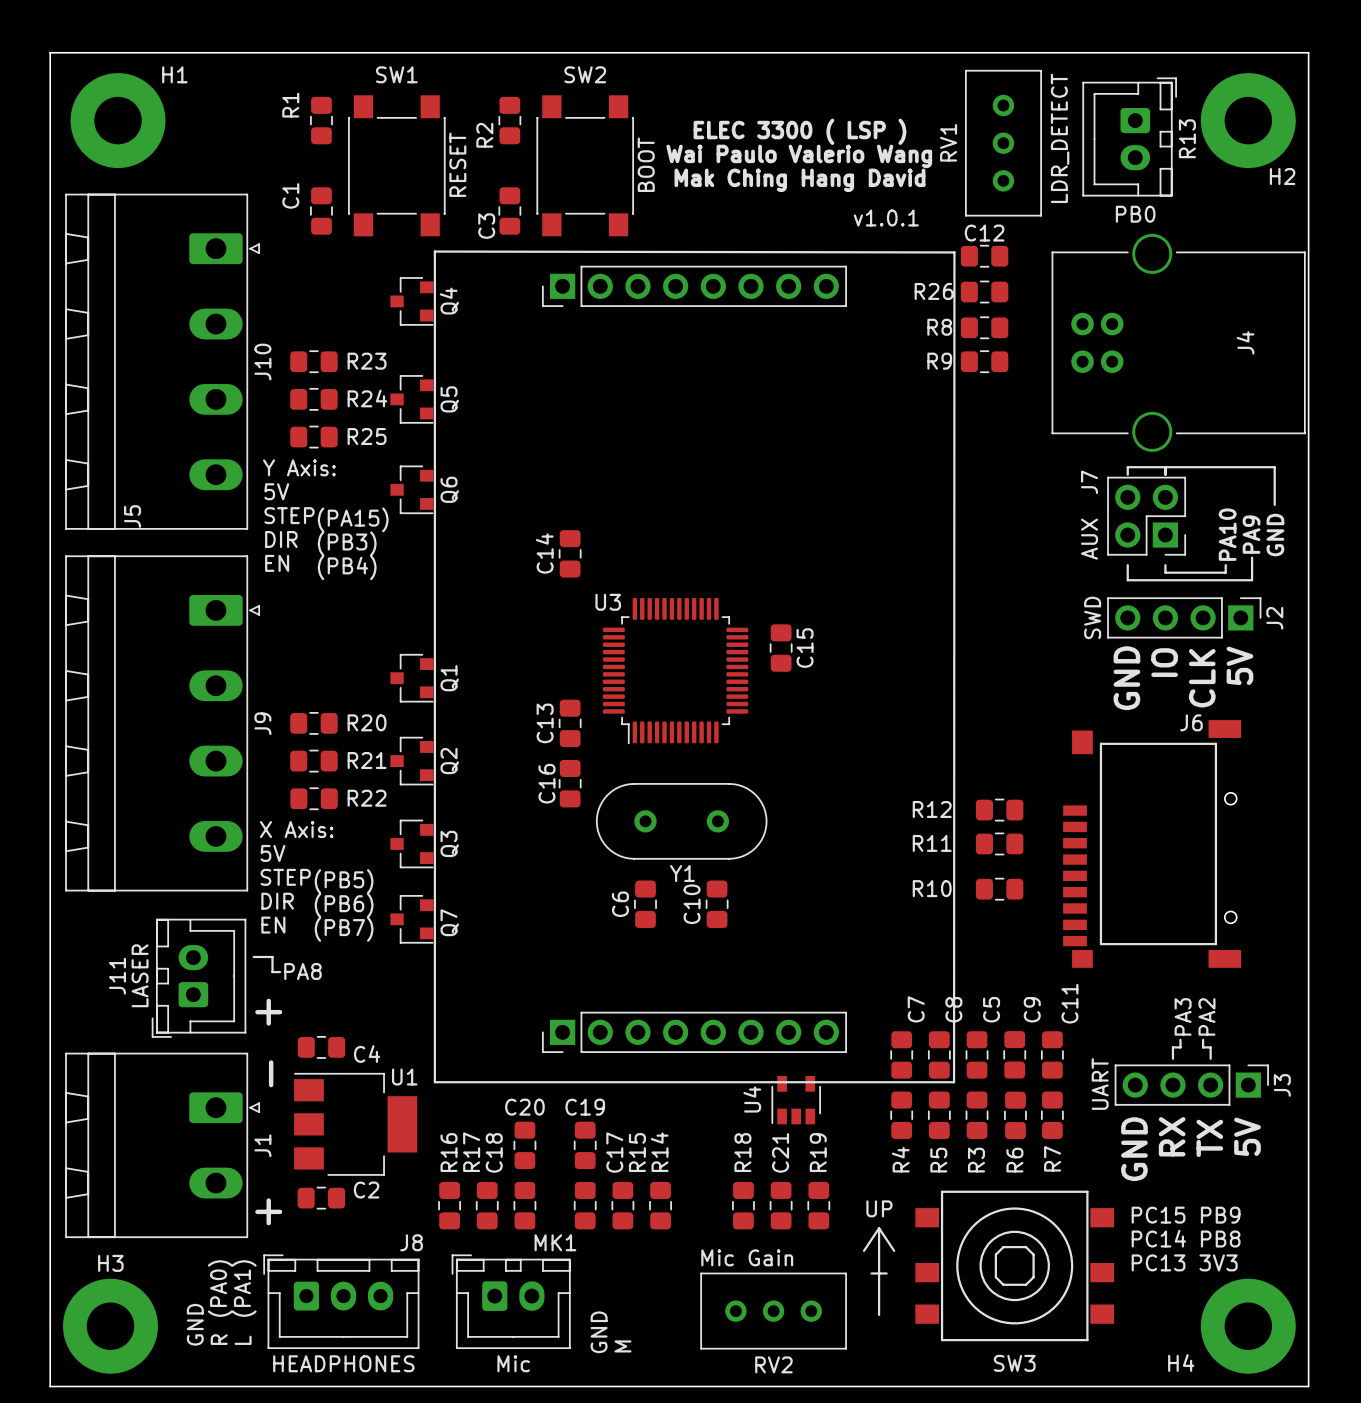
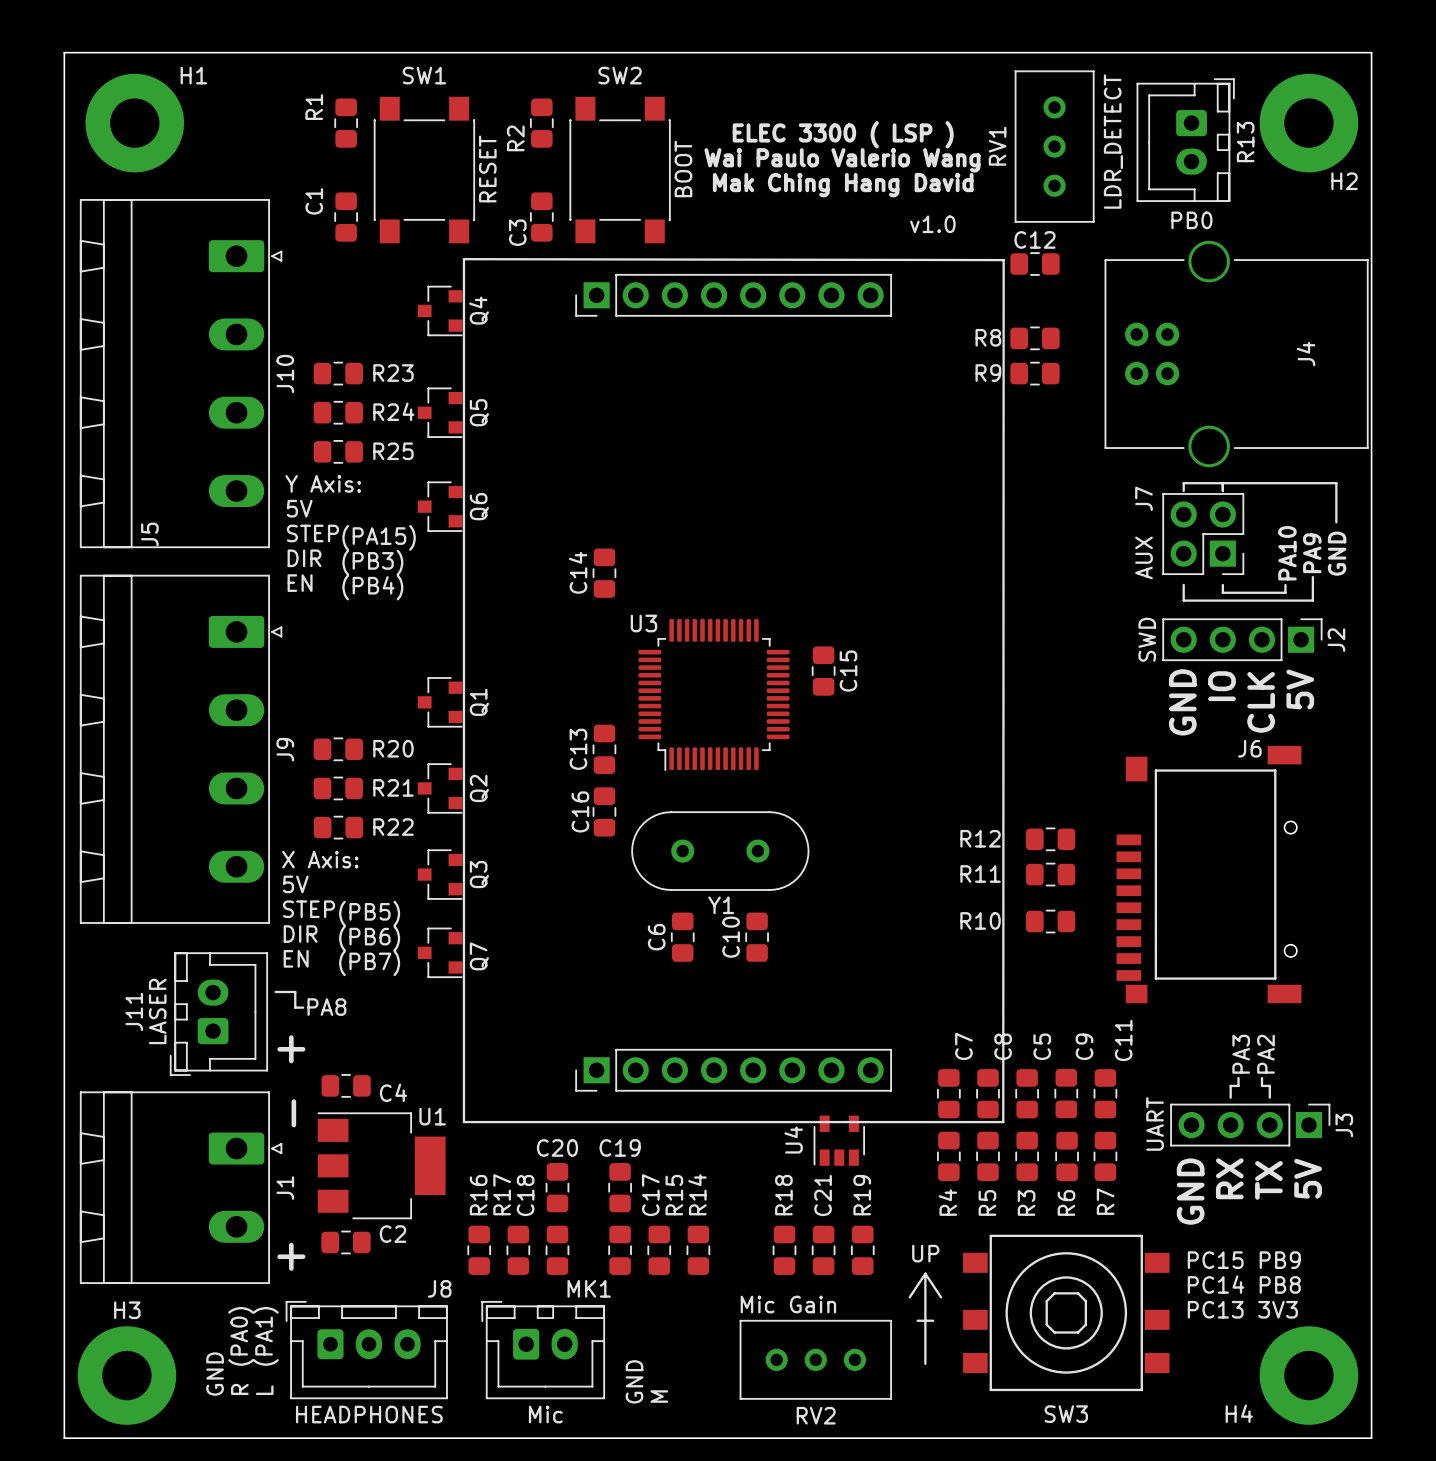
text: v1.0.1 (886, 217) -> v1.0 (932, 224)
R26: (984, 292) -> none

